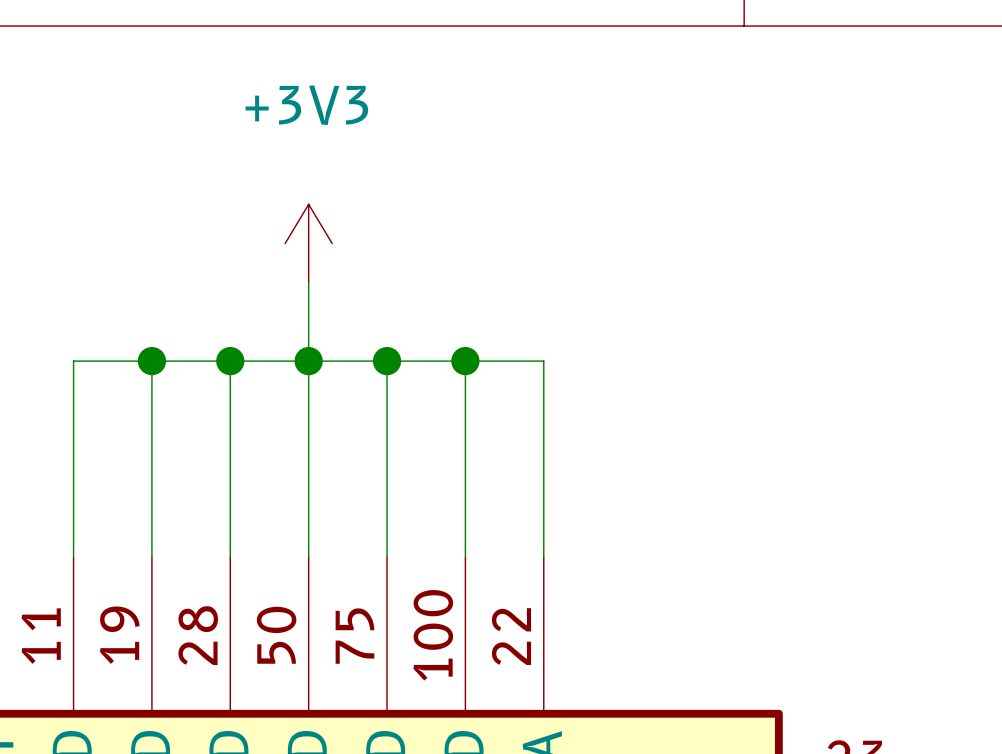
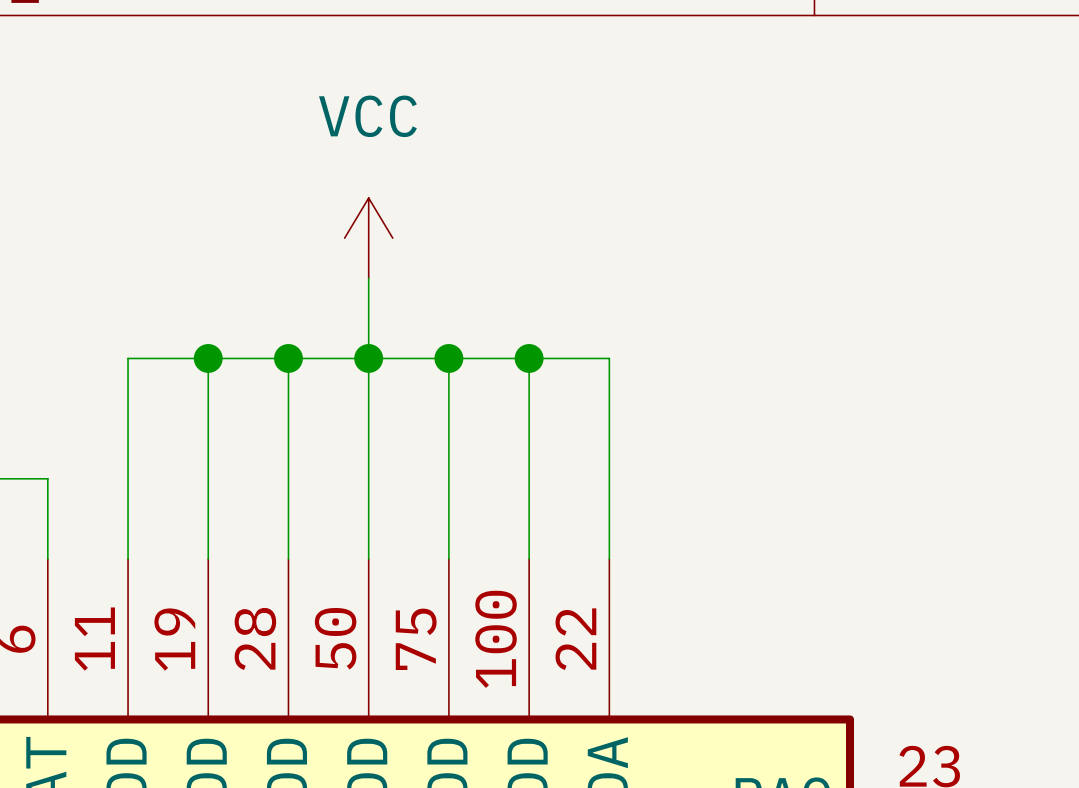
power symbol: +3V3 (308, 243) -> VCC (368, 238)

